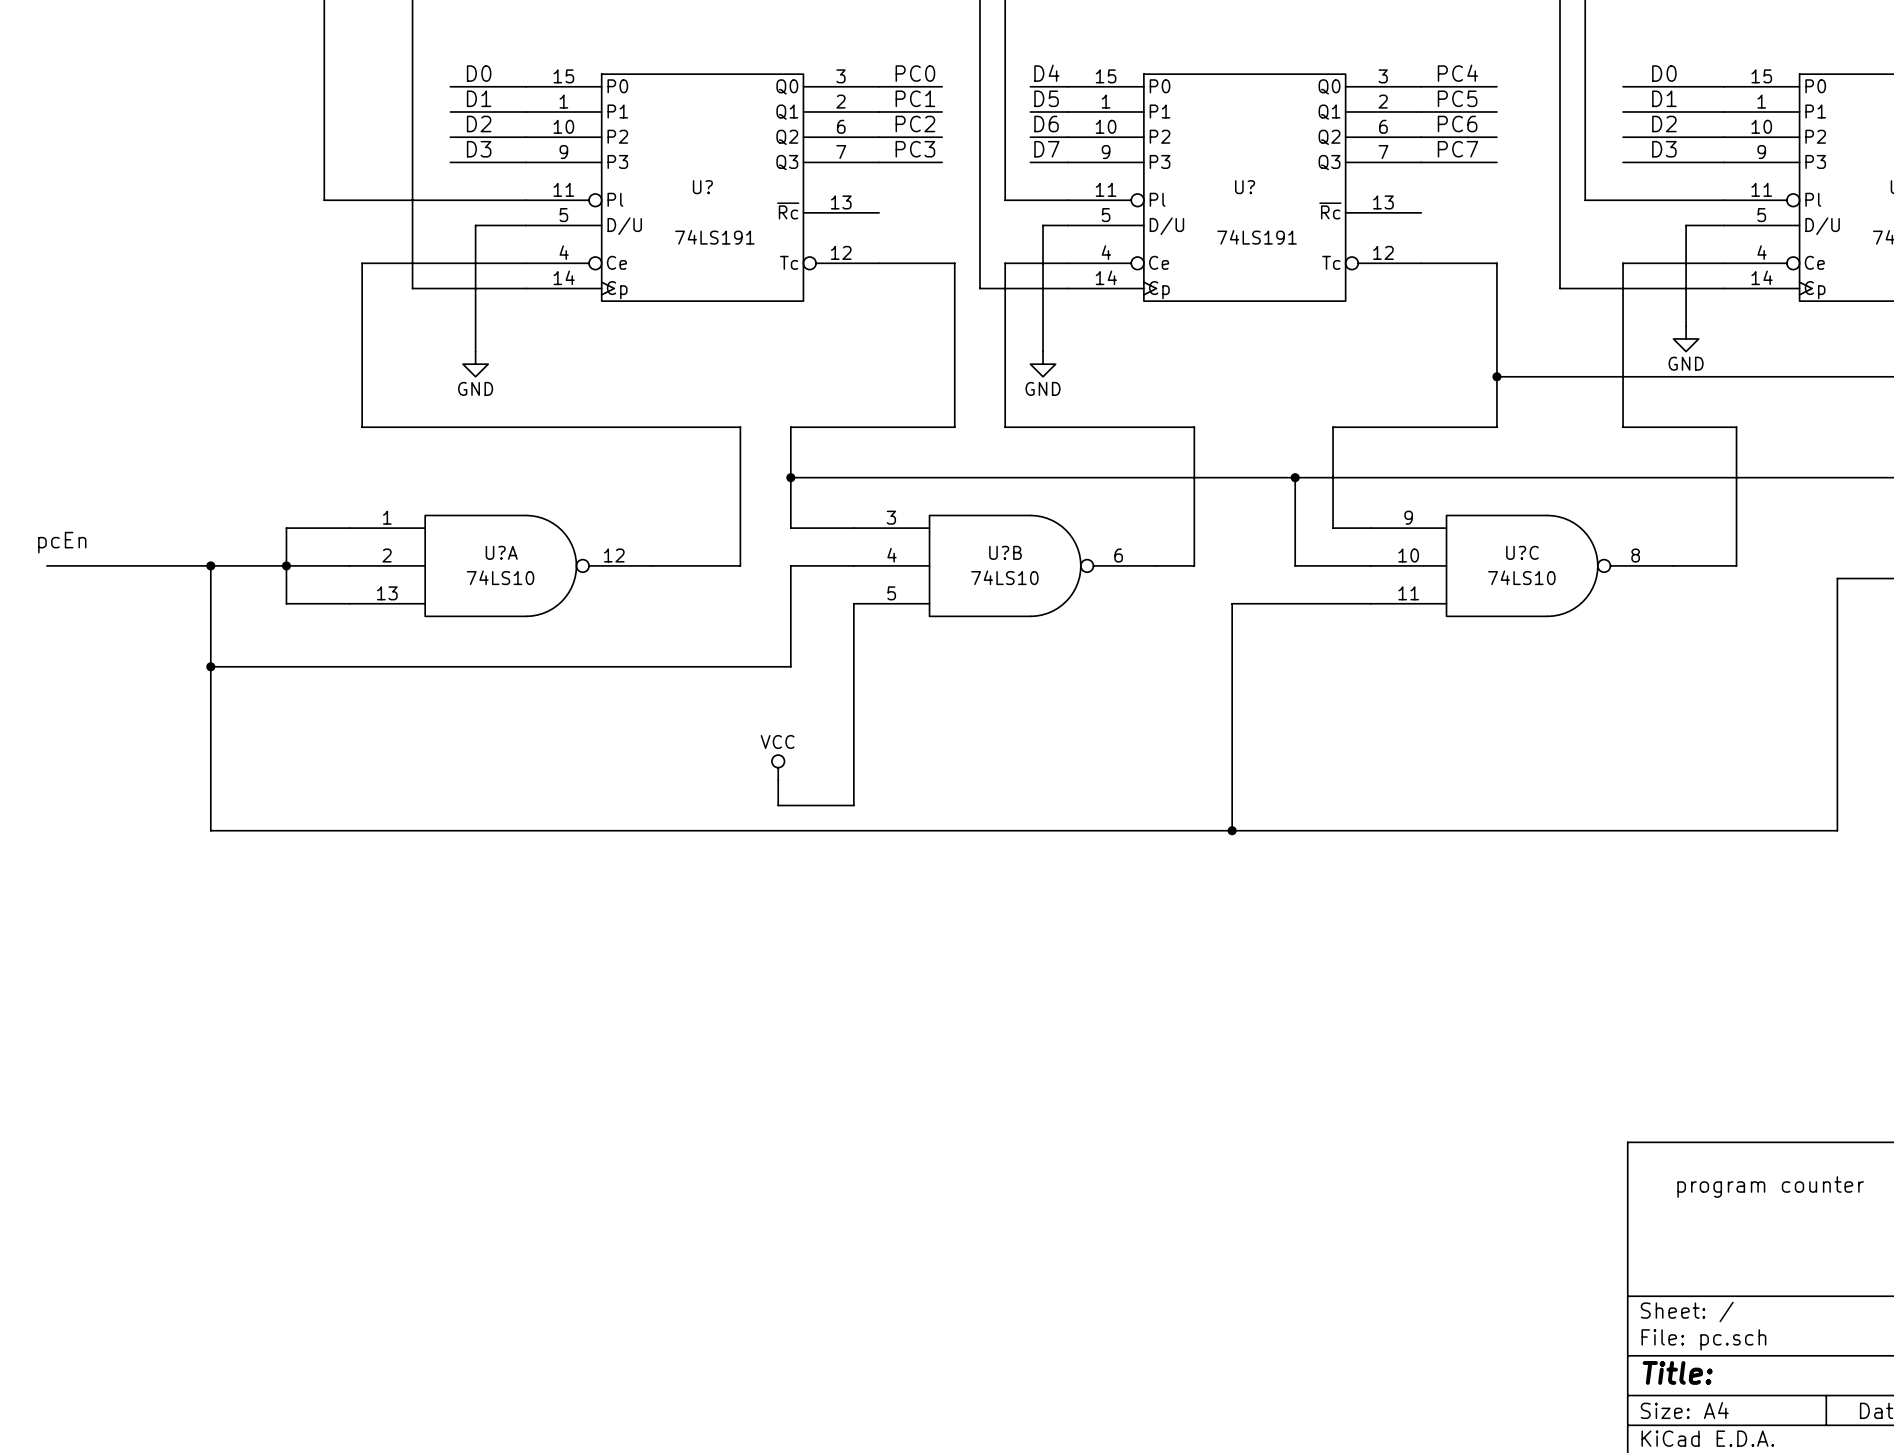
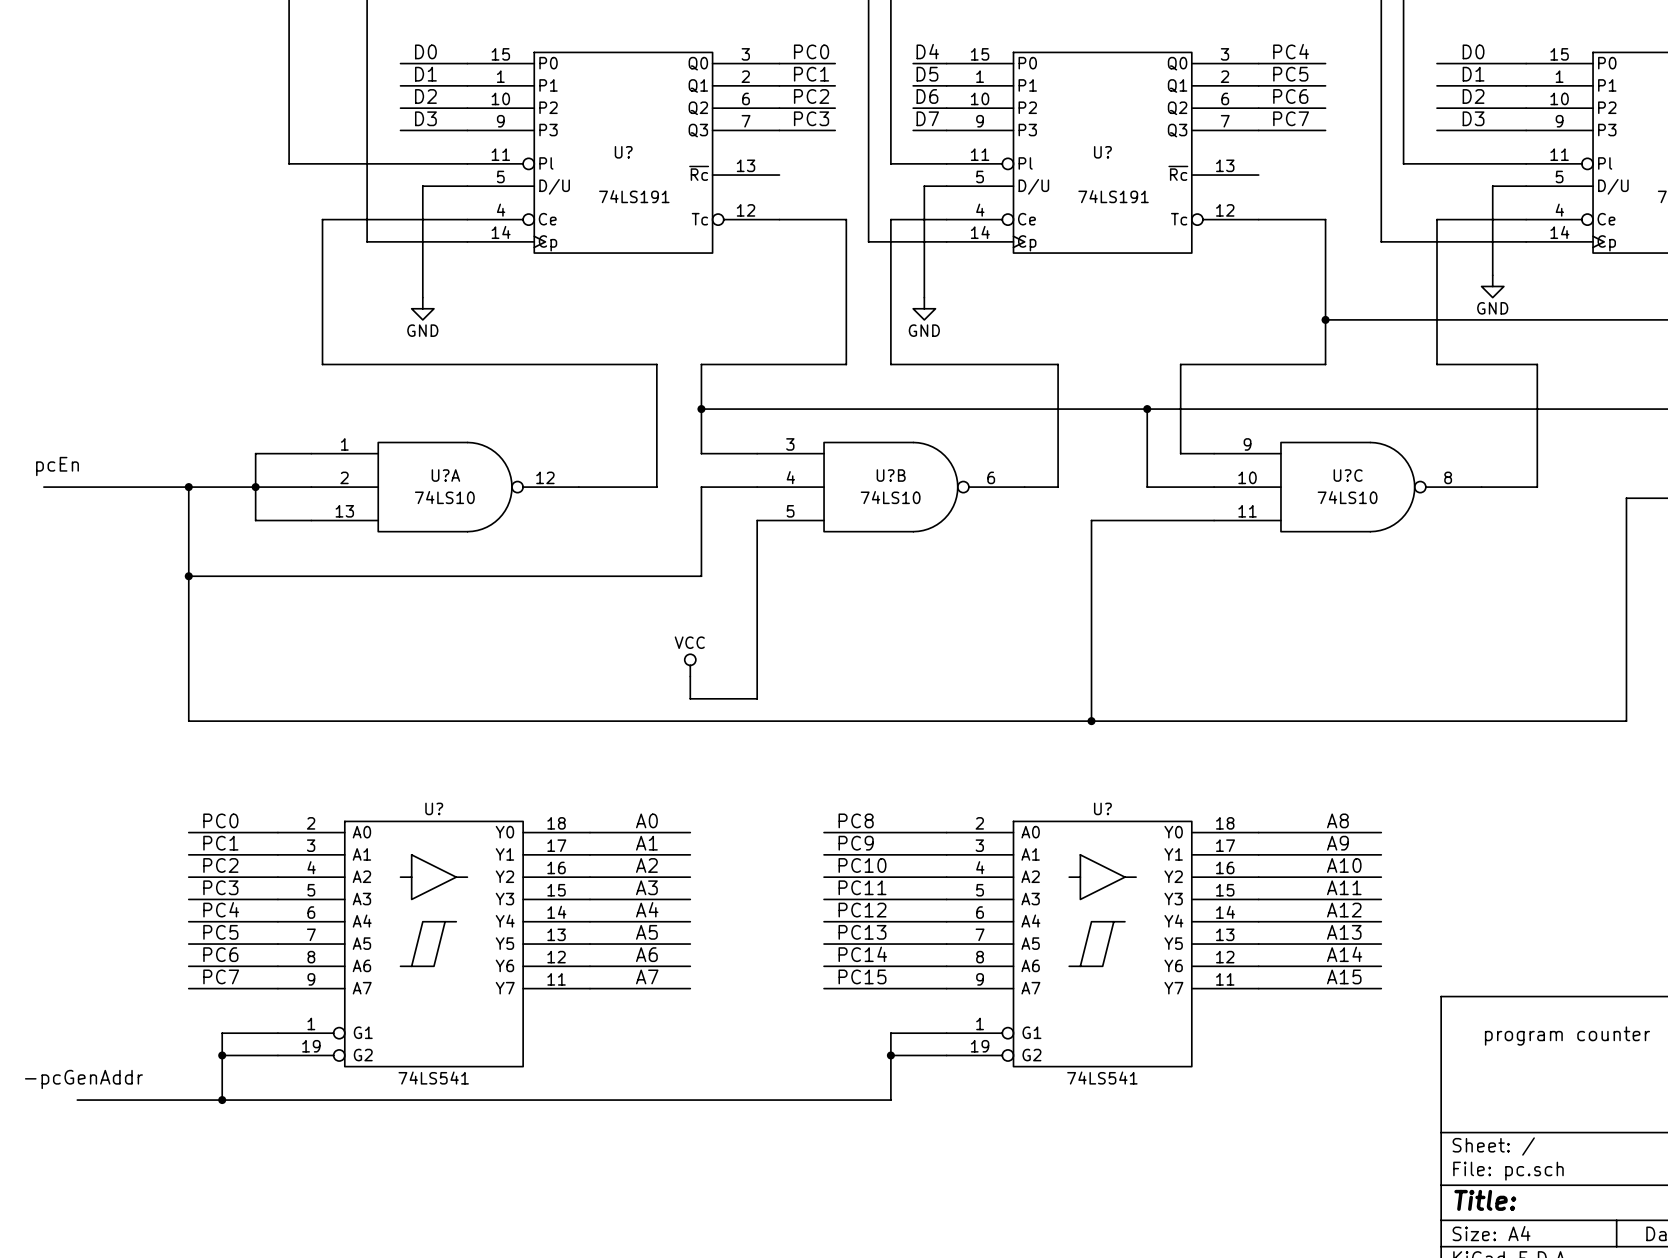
label: none -> PC0 (220, 820)
label: none -> A0 (646, 820)
label: none -> PC8 (856, 820)
label: none -> A8 (1337, 820)
wire: none -> (188, 832) (277, 832)
wire: none -> (589, 832) (690, 832)
wire: none -> (824, 832) (946, 832)
wire: none -> (1258, 832) (1381, 832)
label: none -> PC1 (220, 843)
label: none -> A1 (646, 843)
label: none -> PC9 (856, 843)
label: none -> A9 (1337, 843)
wire: none -> (188, 854) (277, 854)
wire: none -> (589, 854) (690, 854)
wire: none -> (824, 854) (946, 854)
wire: none -> (1258, 854) (1381, 854)
label: none -> PC2 (220, 865)
label: none -> A2 (646, 865)
label: none -> PC10 (862, 865)
label: none -> A10 (1344, 865)
wire: none -> (188, 877) (277, 877)
wire: none -> (589, 877) (690, 877)
wire: none -> (824, 877) (946, 877)
wire: none -> (1258, 877) (1381, 877)
label: none -> PC3 (220, 887)
label: none -> A3 (646, 887)
label: none -> PC11 (862, 887)
label: none -> A11 (1344, 887)
wire: none -> (188, 899) (277, 899)
wire: none -> (589, 899) (690, 899)
wire: none -> (824, 899) (946, 899)
wire: none -> (1258, 899) (1381, 899)
label: none -> PC4 (221, 909)
label: none -> A4 (647, 909)
label: none -> PC12 (862, 910)
label: none -> A12 (1344, 910)
wire: none -> (188, 921) (277, 921)
wire: none -> (589, 921) (690, 921)
wire: none -> (824, 921) (946, 921)
wire: none -> (1258, 921) (1381, 921)
label: none -> PC5 (220, 932)
label: none -> A5 (646, 932)
label: none -> PC13 (862, 932)
label: none -> A13 (1344, 932)
wire: none -> (188, 944) (277, 944)
U?: none -> 74LS541 (433, 944)
wire: none -> (589, 944) (690, 944)
wire: none -> (824, 944) (946, 944)
U?: none -> 74LS541 (1102, 944)
wire: none -> (1258, 944) (1381, 944)
label: none -> PC6 (220, 954)
label: none -> A6 (646, 954)
label: none -> PC14 (862, 954)
label: none -> A14 (1344, 954)
wire: none -> (188, 966) (277, 966)
wire: none -> (589, 966) (690, 966)
wire: none -> (824, 966) (946, 966)
wire: none -> (1258, 966) (1381, 966)
label: none -> PC7 (221, 976)
label: none -> A7 (647, 976)
label: none -> PC15 (862, 976)
label: none -> A15 (1344, 976)
wire: none -> (188, 988) (277, 988)
wire: none -> (589, 988) (690, 988)
wire: none -> (824, 988) (946, 988)
wire: none -> (1258, 988) (1381, 988)
wire: none -> (277, 1033) (222, 1033) (222, 1100)
wire: none -> (946, 1033) (890, 1033) (890, 1100) (77, 1100)
wire: none -> (222, 1055) (277, 1055)
junction: none -> (222, 1055)
wire: none -> (890, 1055) (946, 1055)
junction: none -> (890, 1055)
label: none -> -pcGenAddr (83, 1079)
junction: none -> (222, 1100)

